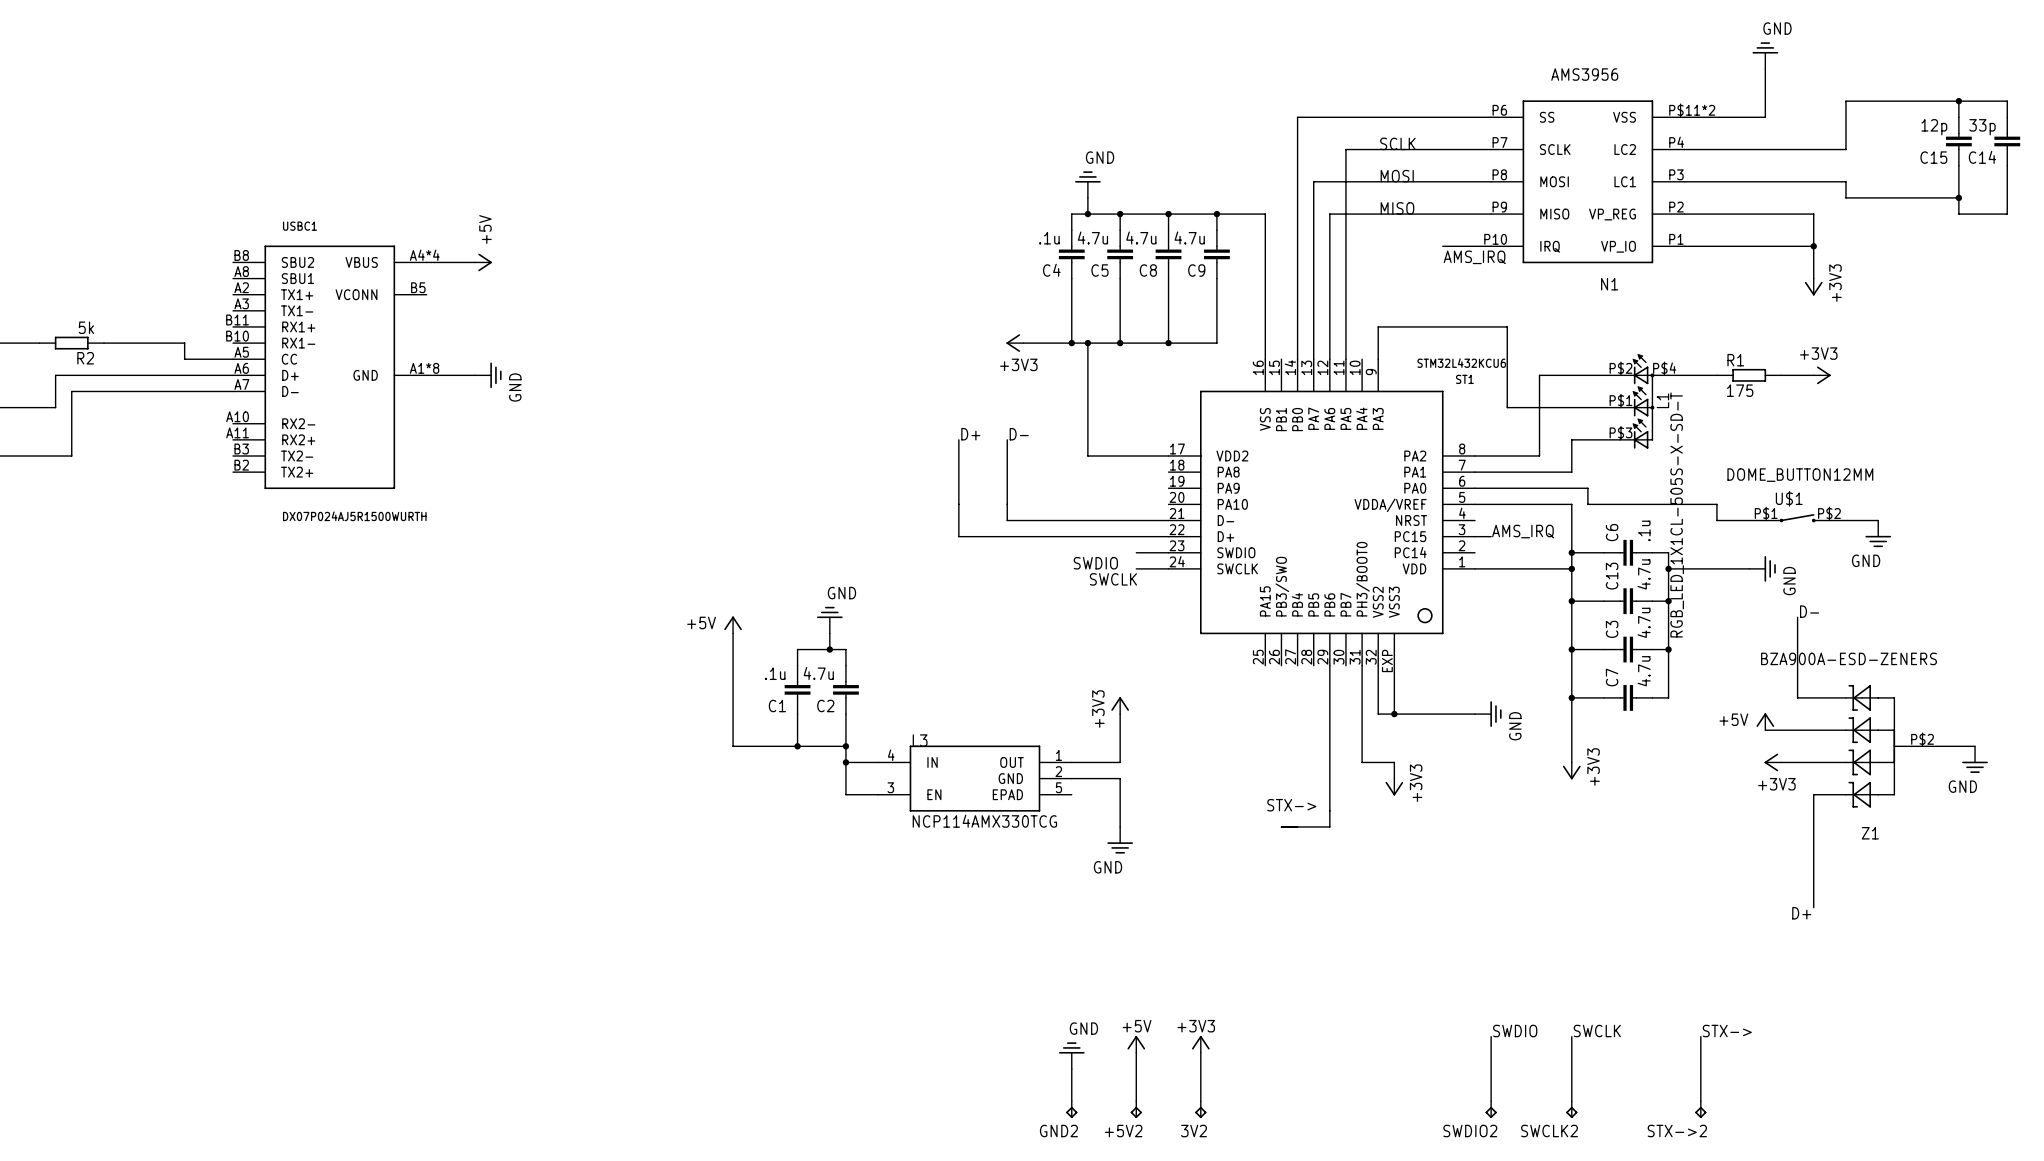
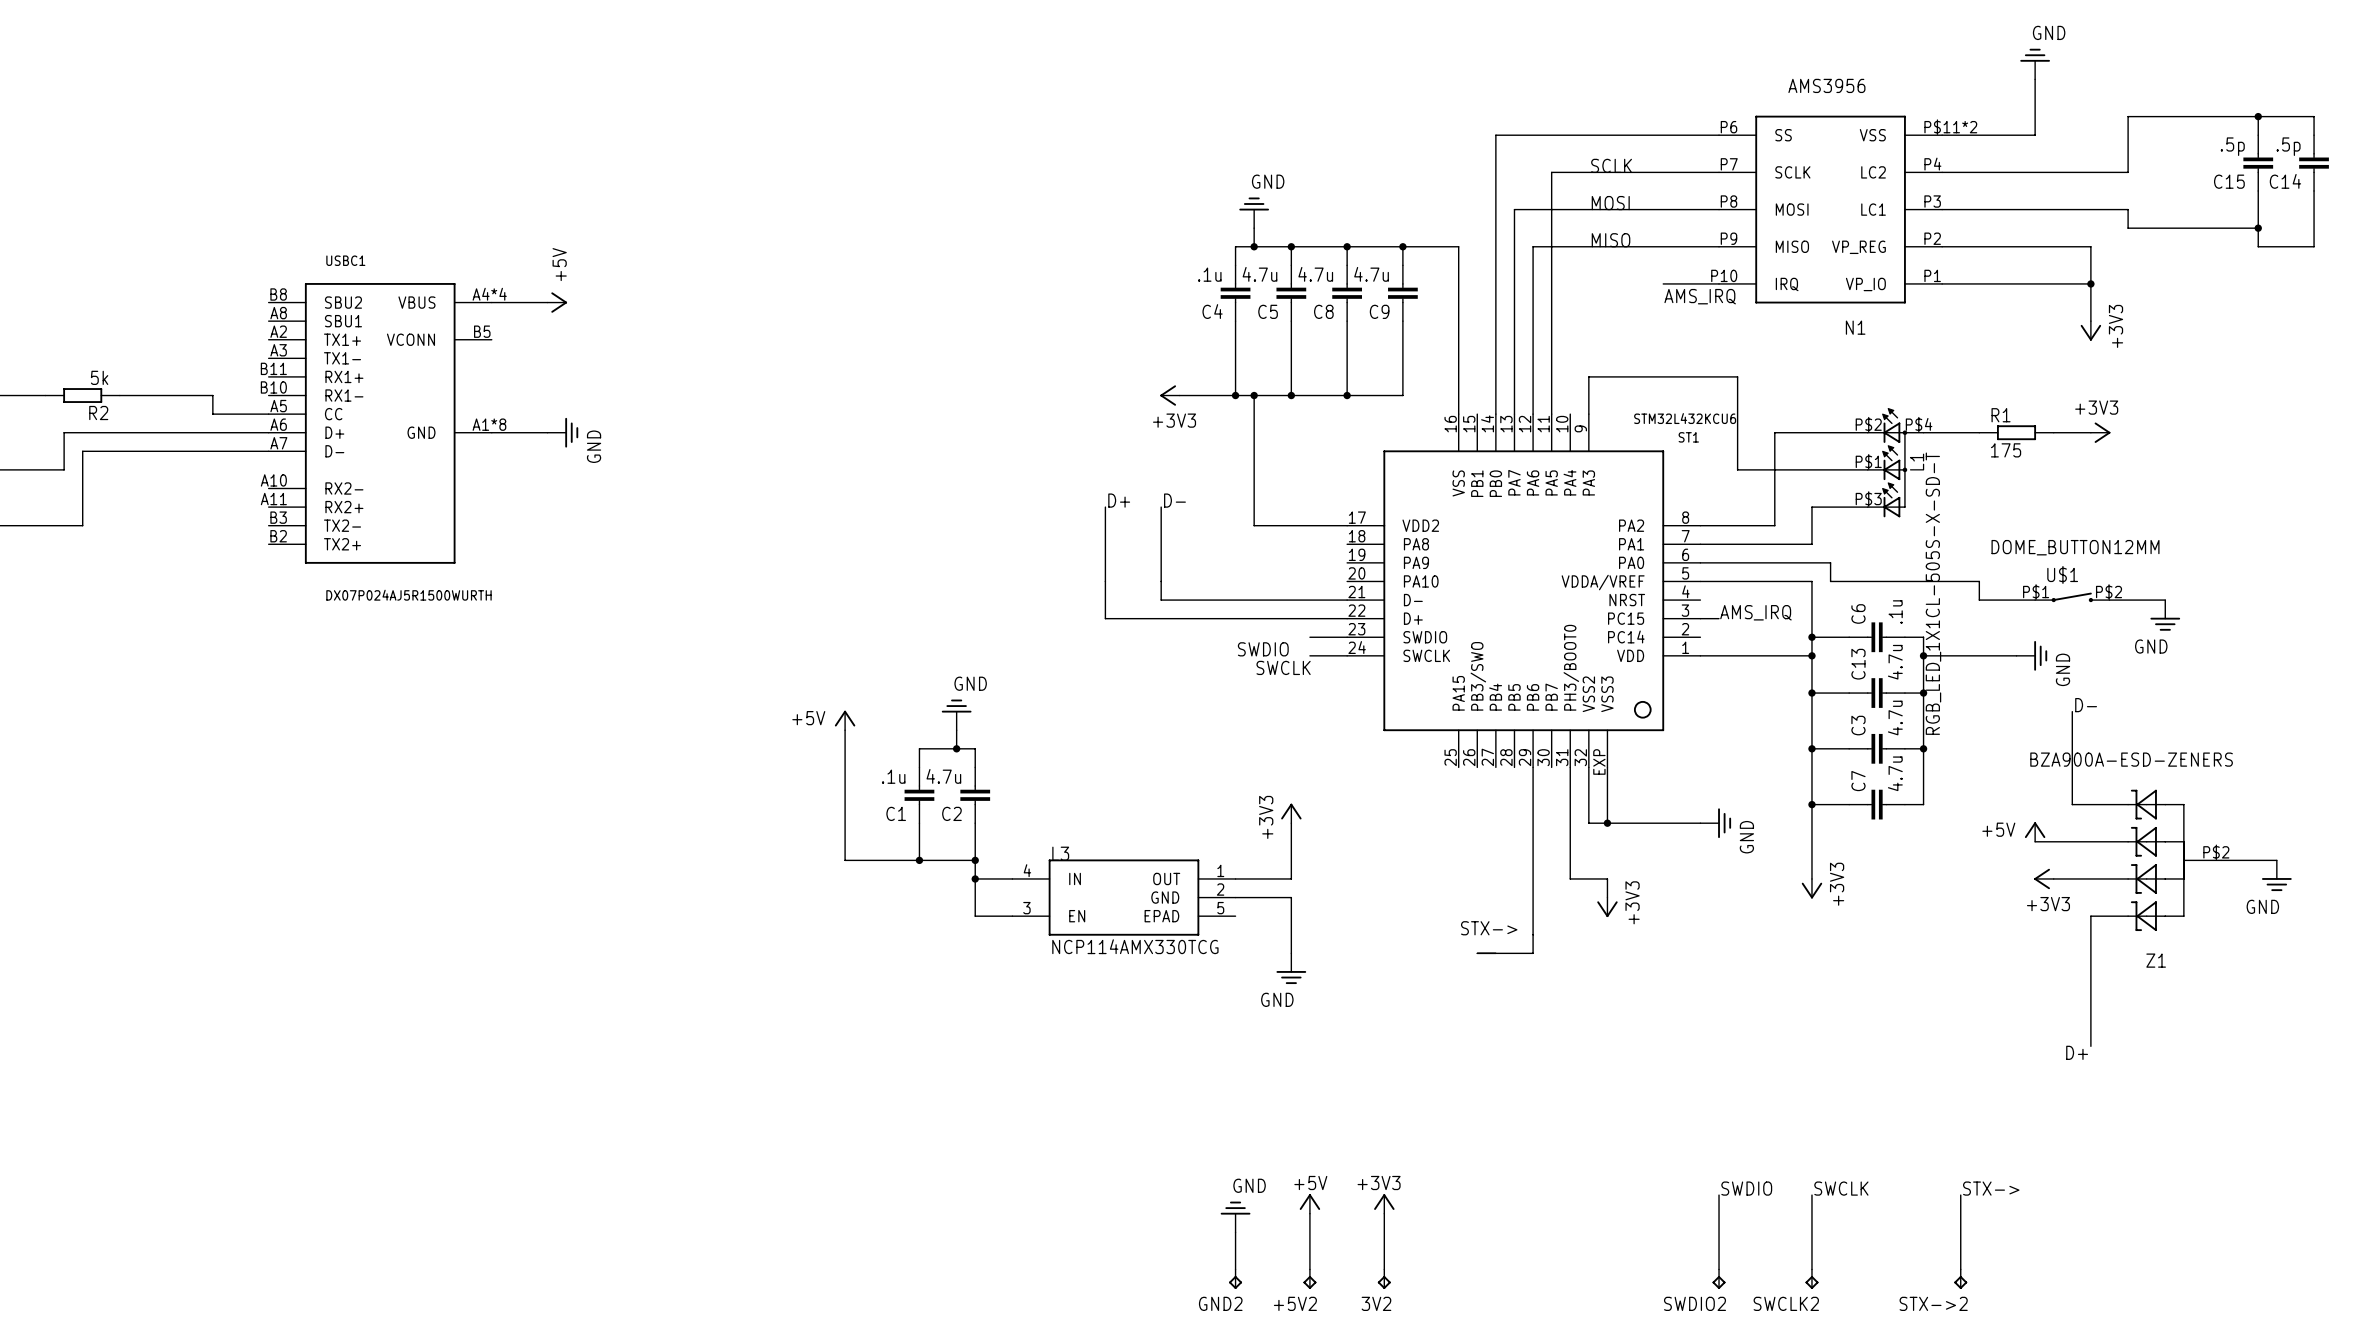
C15 value: 12p (1934, 127) -> .5p (2232, 146)
C14 value: 33p (1982, 127) -> .5p (2288, 146)

